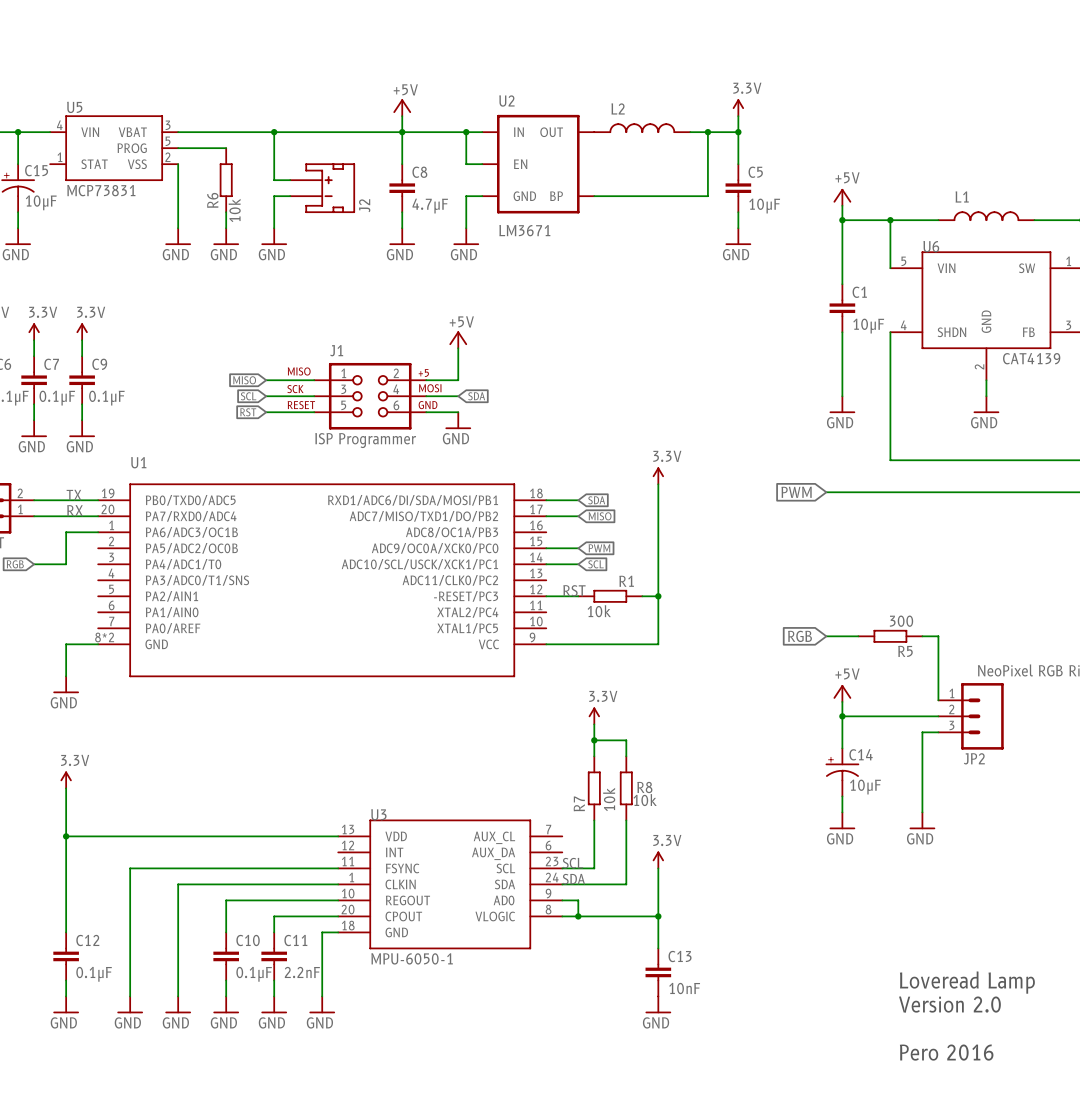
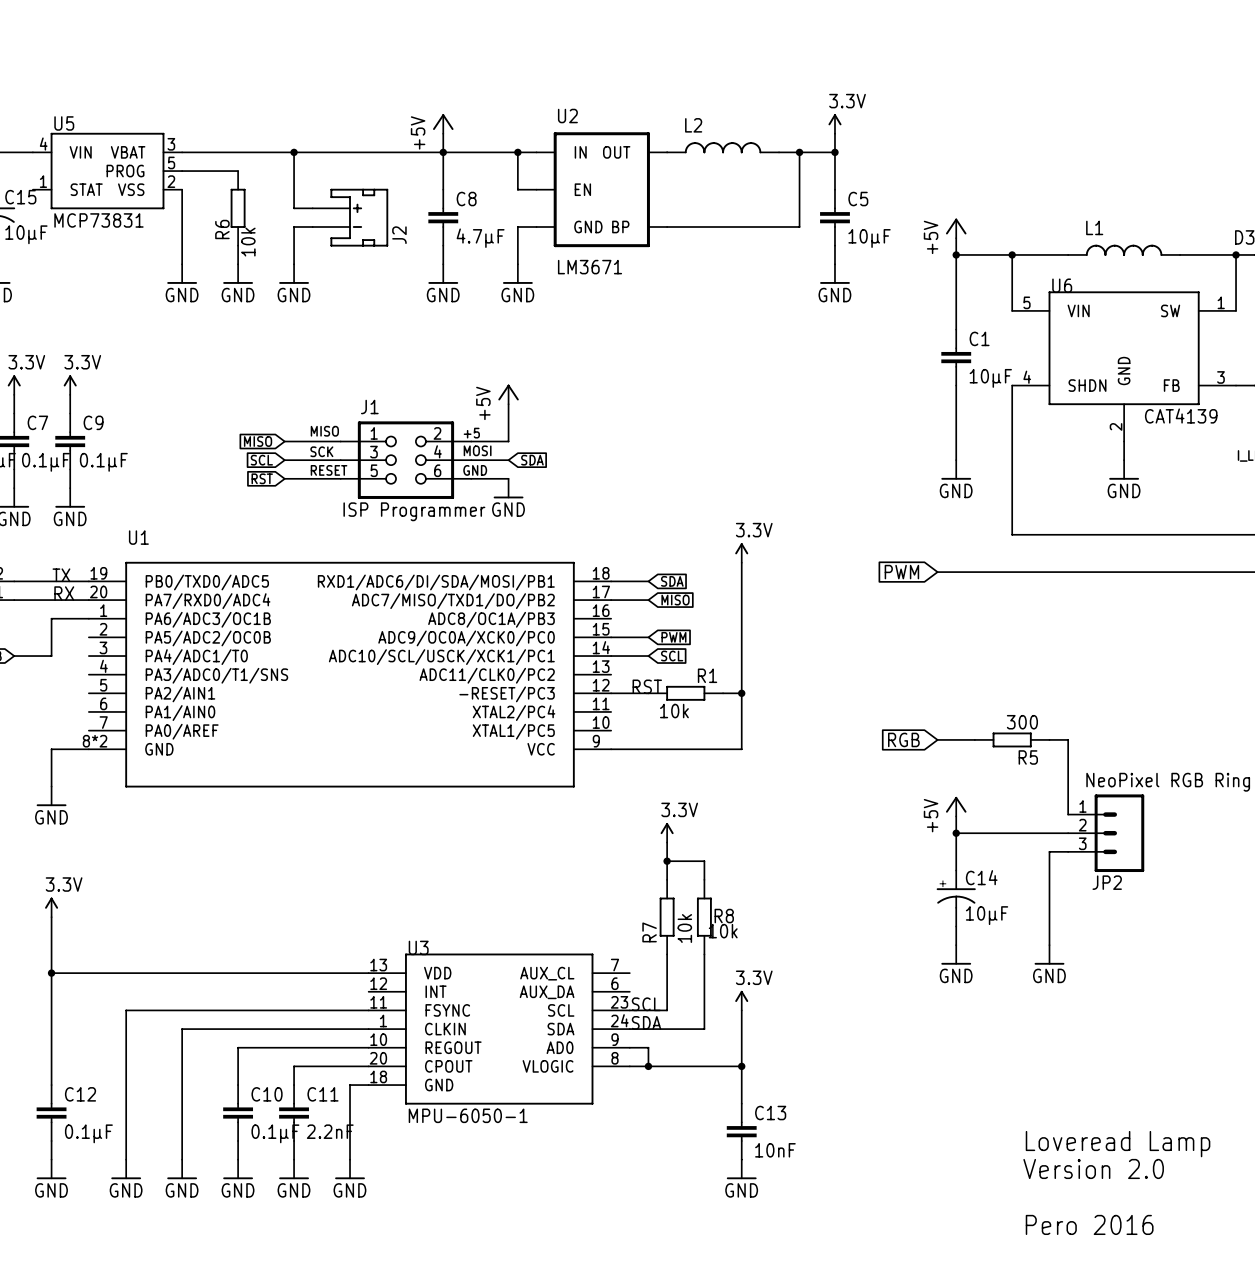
power symbol text rotation: 0° (405, 89) -> 90° counterclockwise (418, 132)
power symbol text rotation: 0° (847, 177) -> 90° counterclockwise (931, 237)
power symbol text rotation: 0° (461, 321) -> 90° counterclockwise (483, 403)
power symbol text rotation: 0° (847, 674) -> 90° counterclockwise (931, 815)

